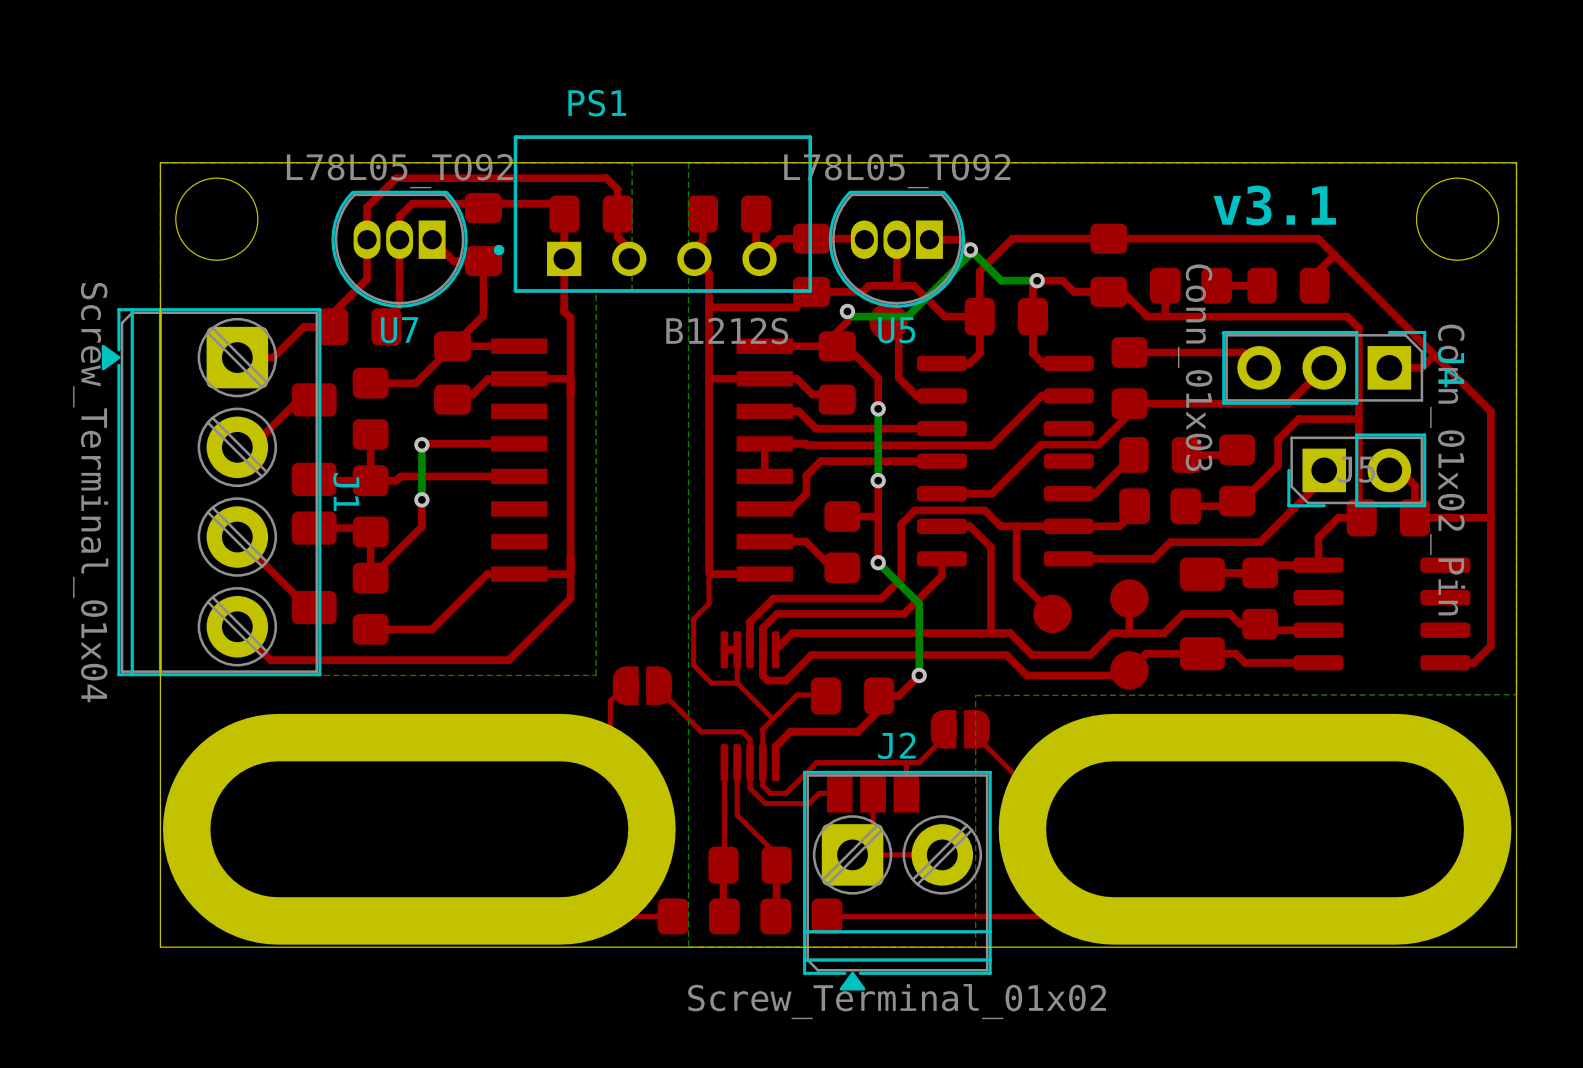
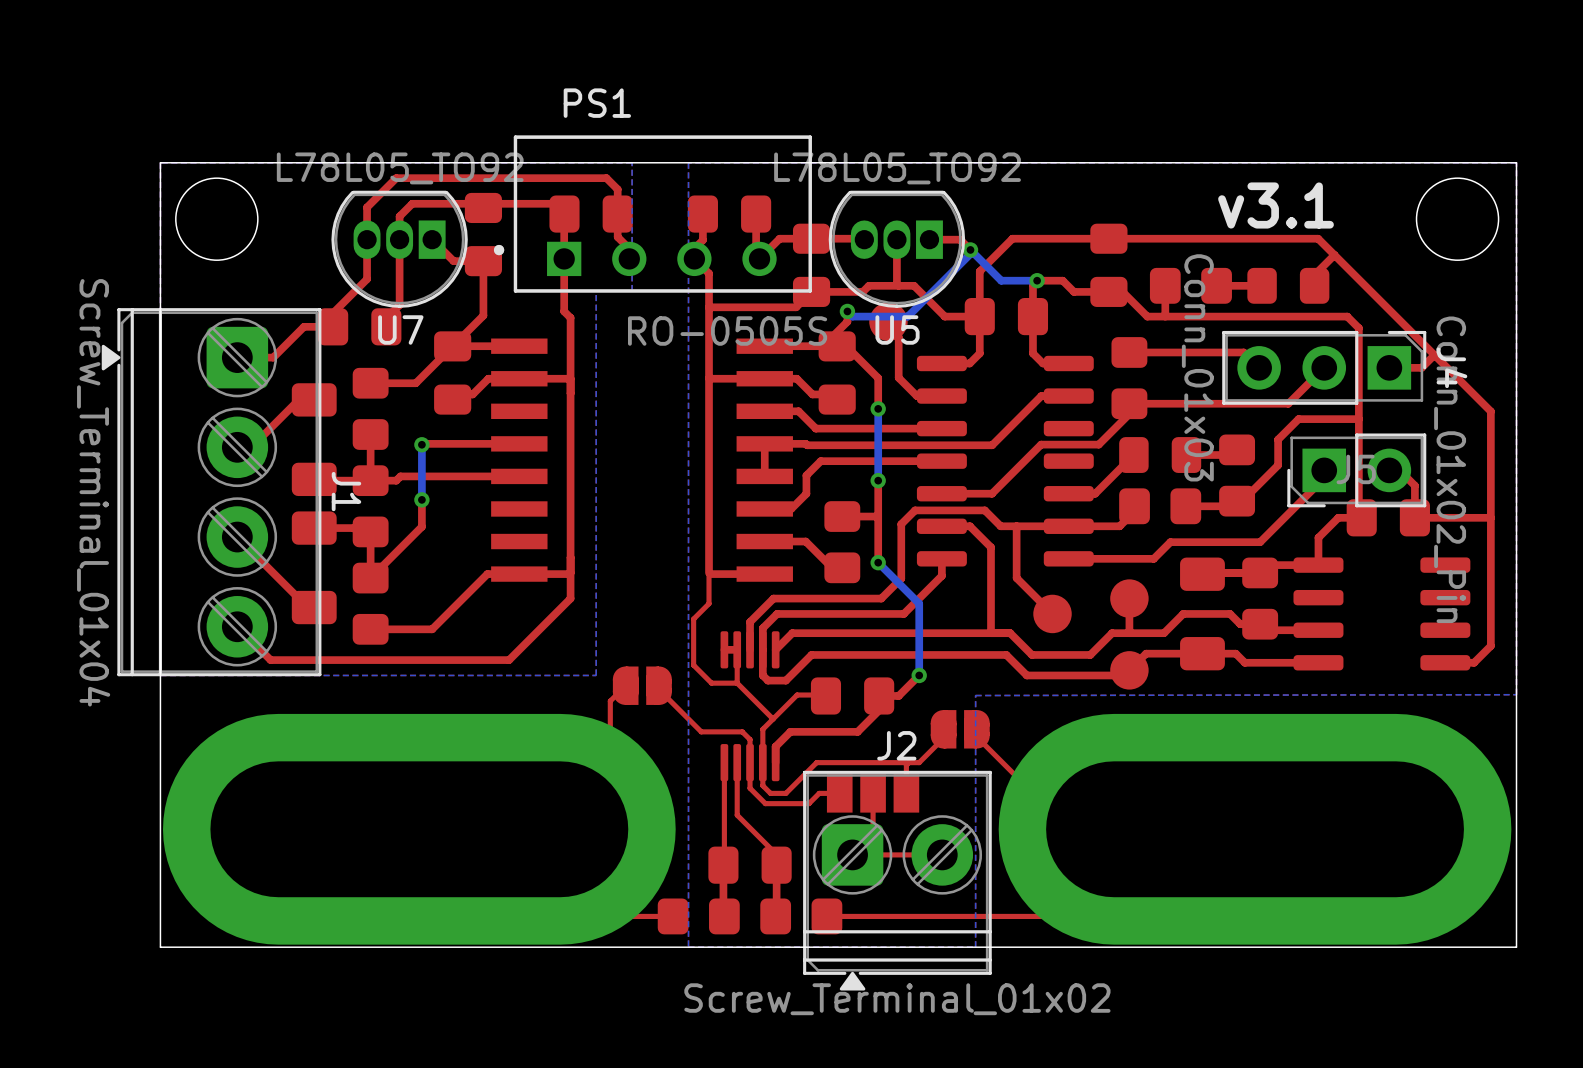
PS1 value: B1212S (727, 331) -> RO-0505S (727, 331)

